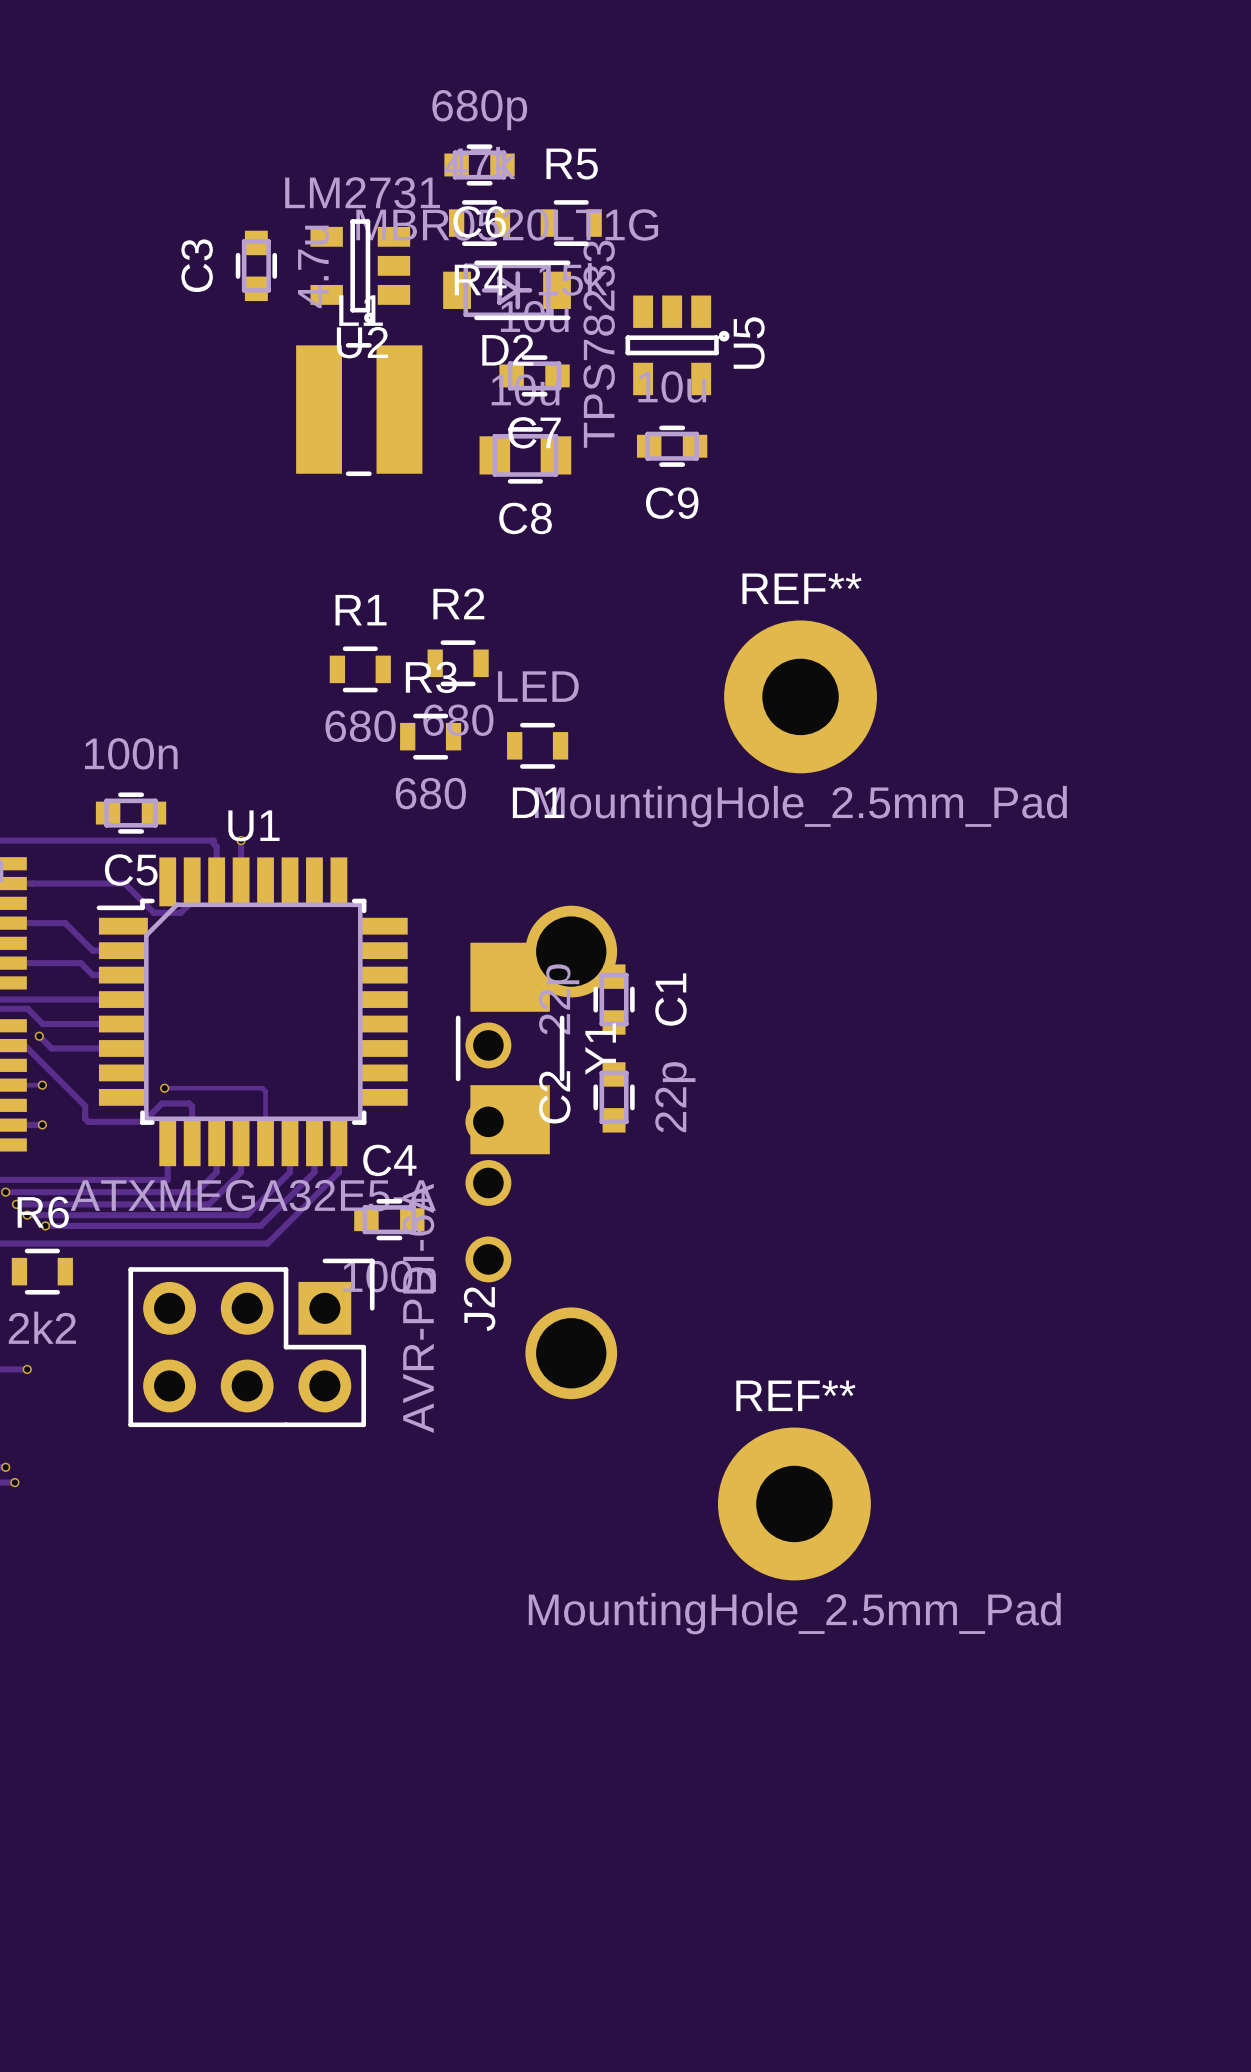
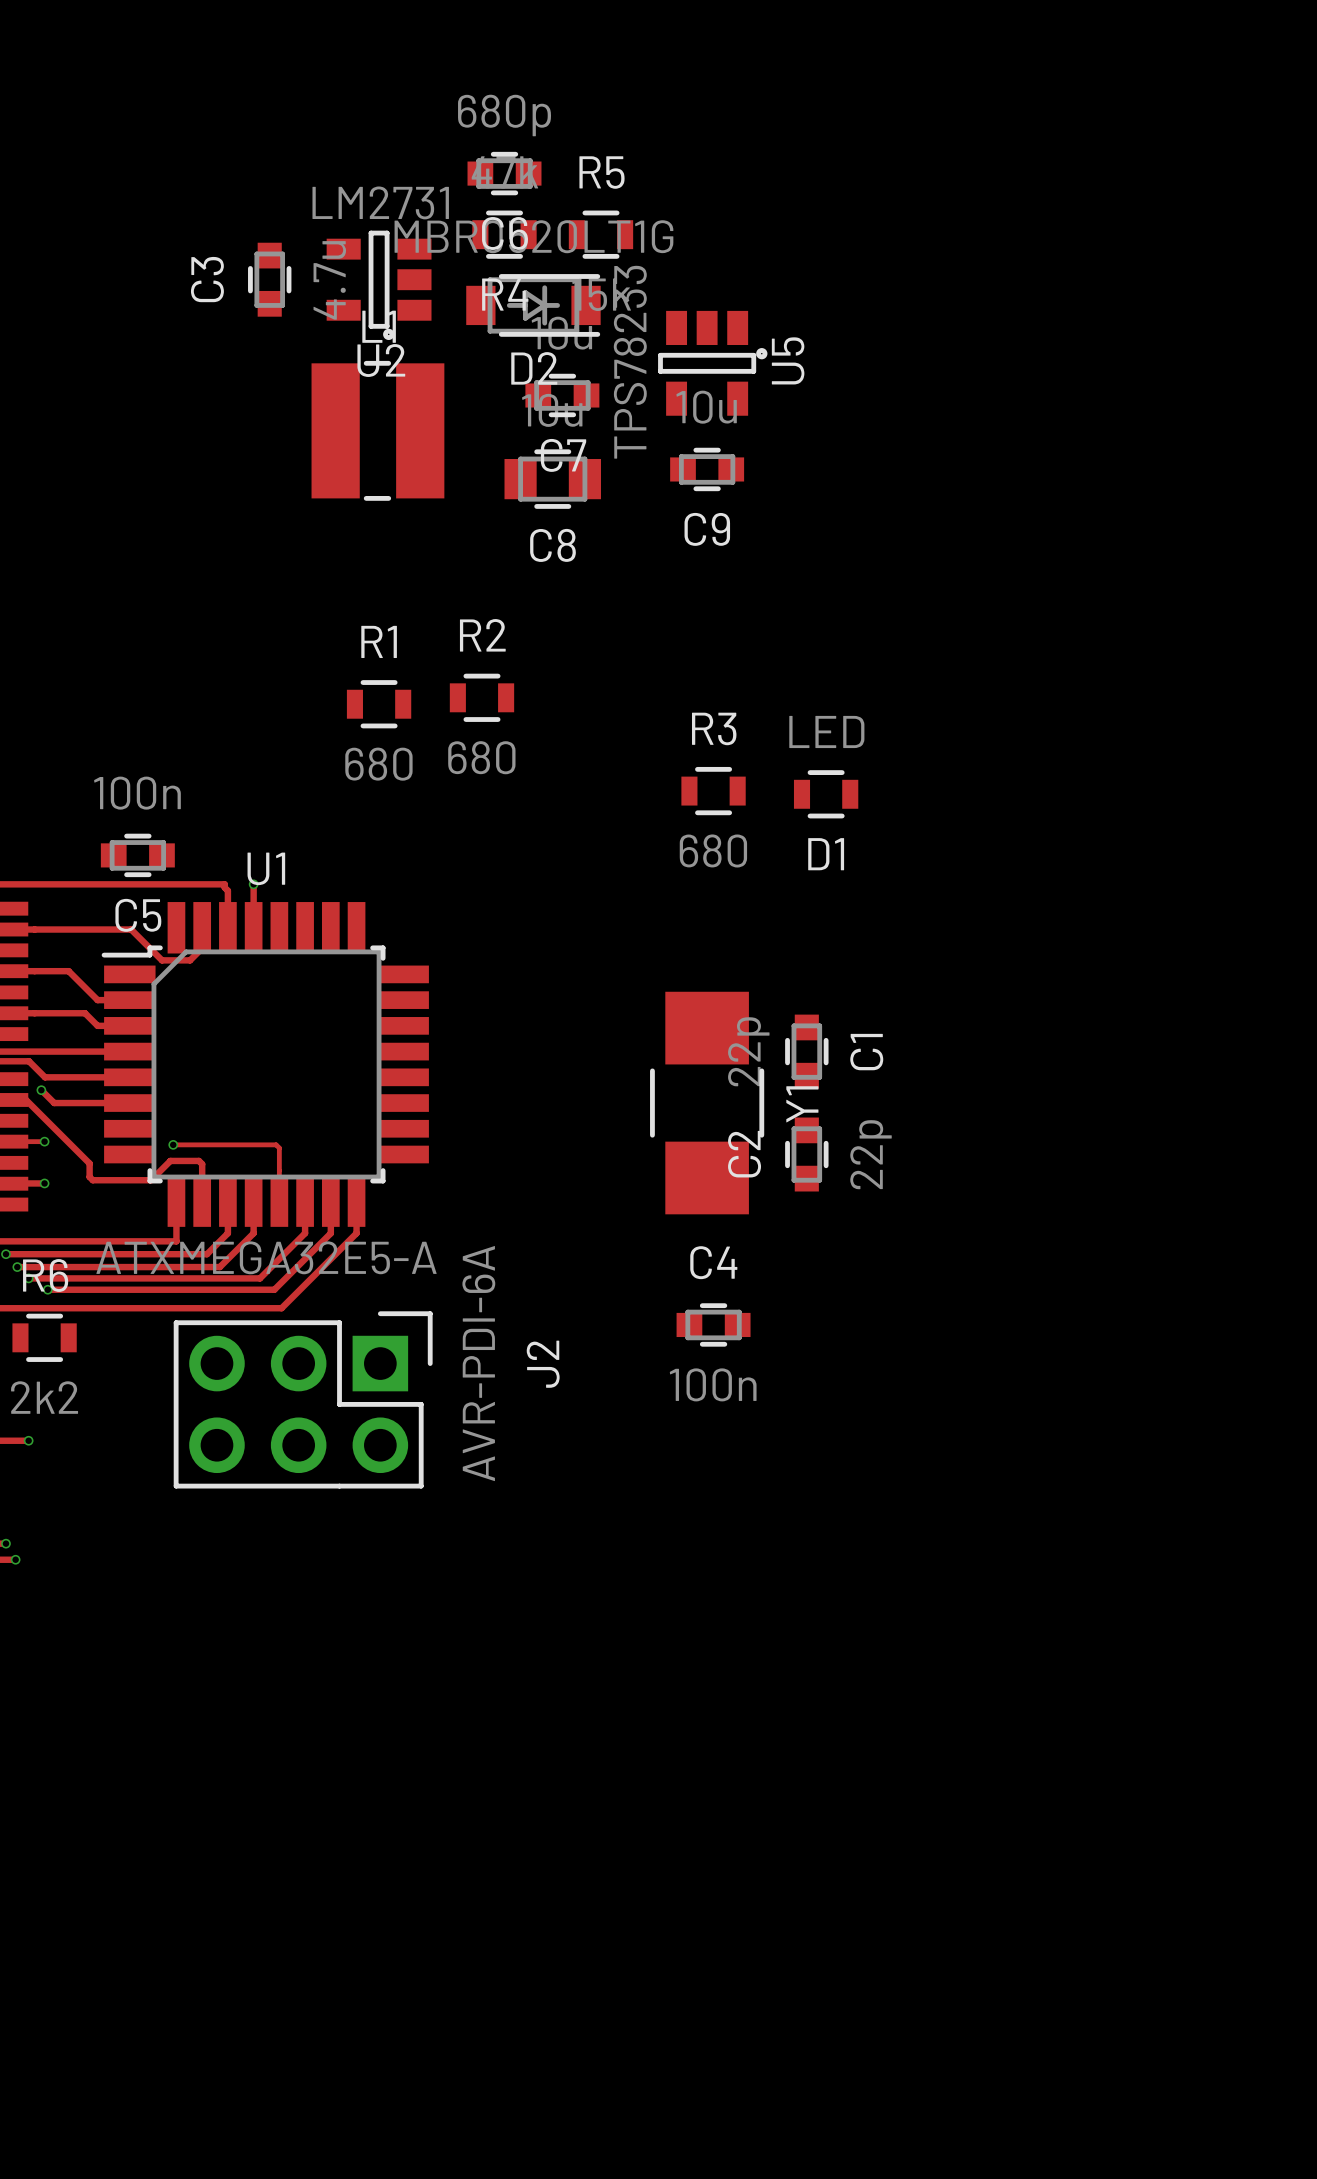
REF**: MountingHole_2.5mm_Pad (800, 696) -> none
R3 position: (430, 736) -> (713, 791)
D1 position: (537, 745) -> (826, 794)
C1 position: (614, 999) -> (806, 1051)
Y1 position: (510, 1048) -> (707, 1103)
C2 position: (614, 1097) -> (806, 1154)
part: (541, 1152) -> none
C4 position: (389, 1219) -> (713, 1324)
J2 position: (251, 1342) -> (303, 1399)
REF**: MountingHole_2.5mm_Pad (794, 1503) -> none

